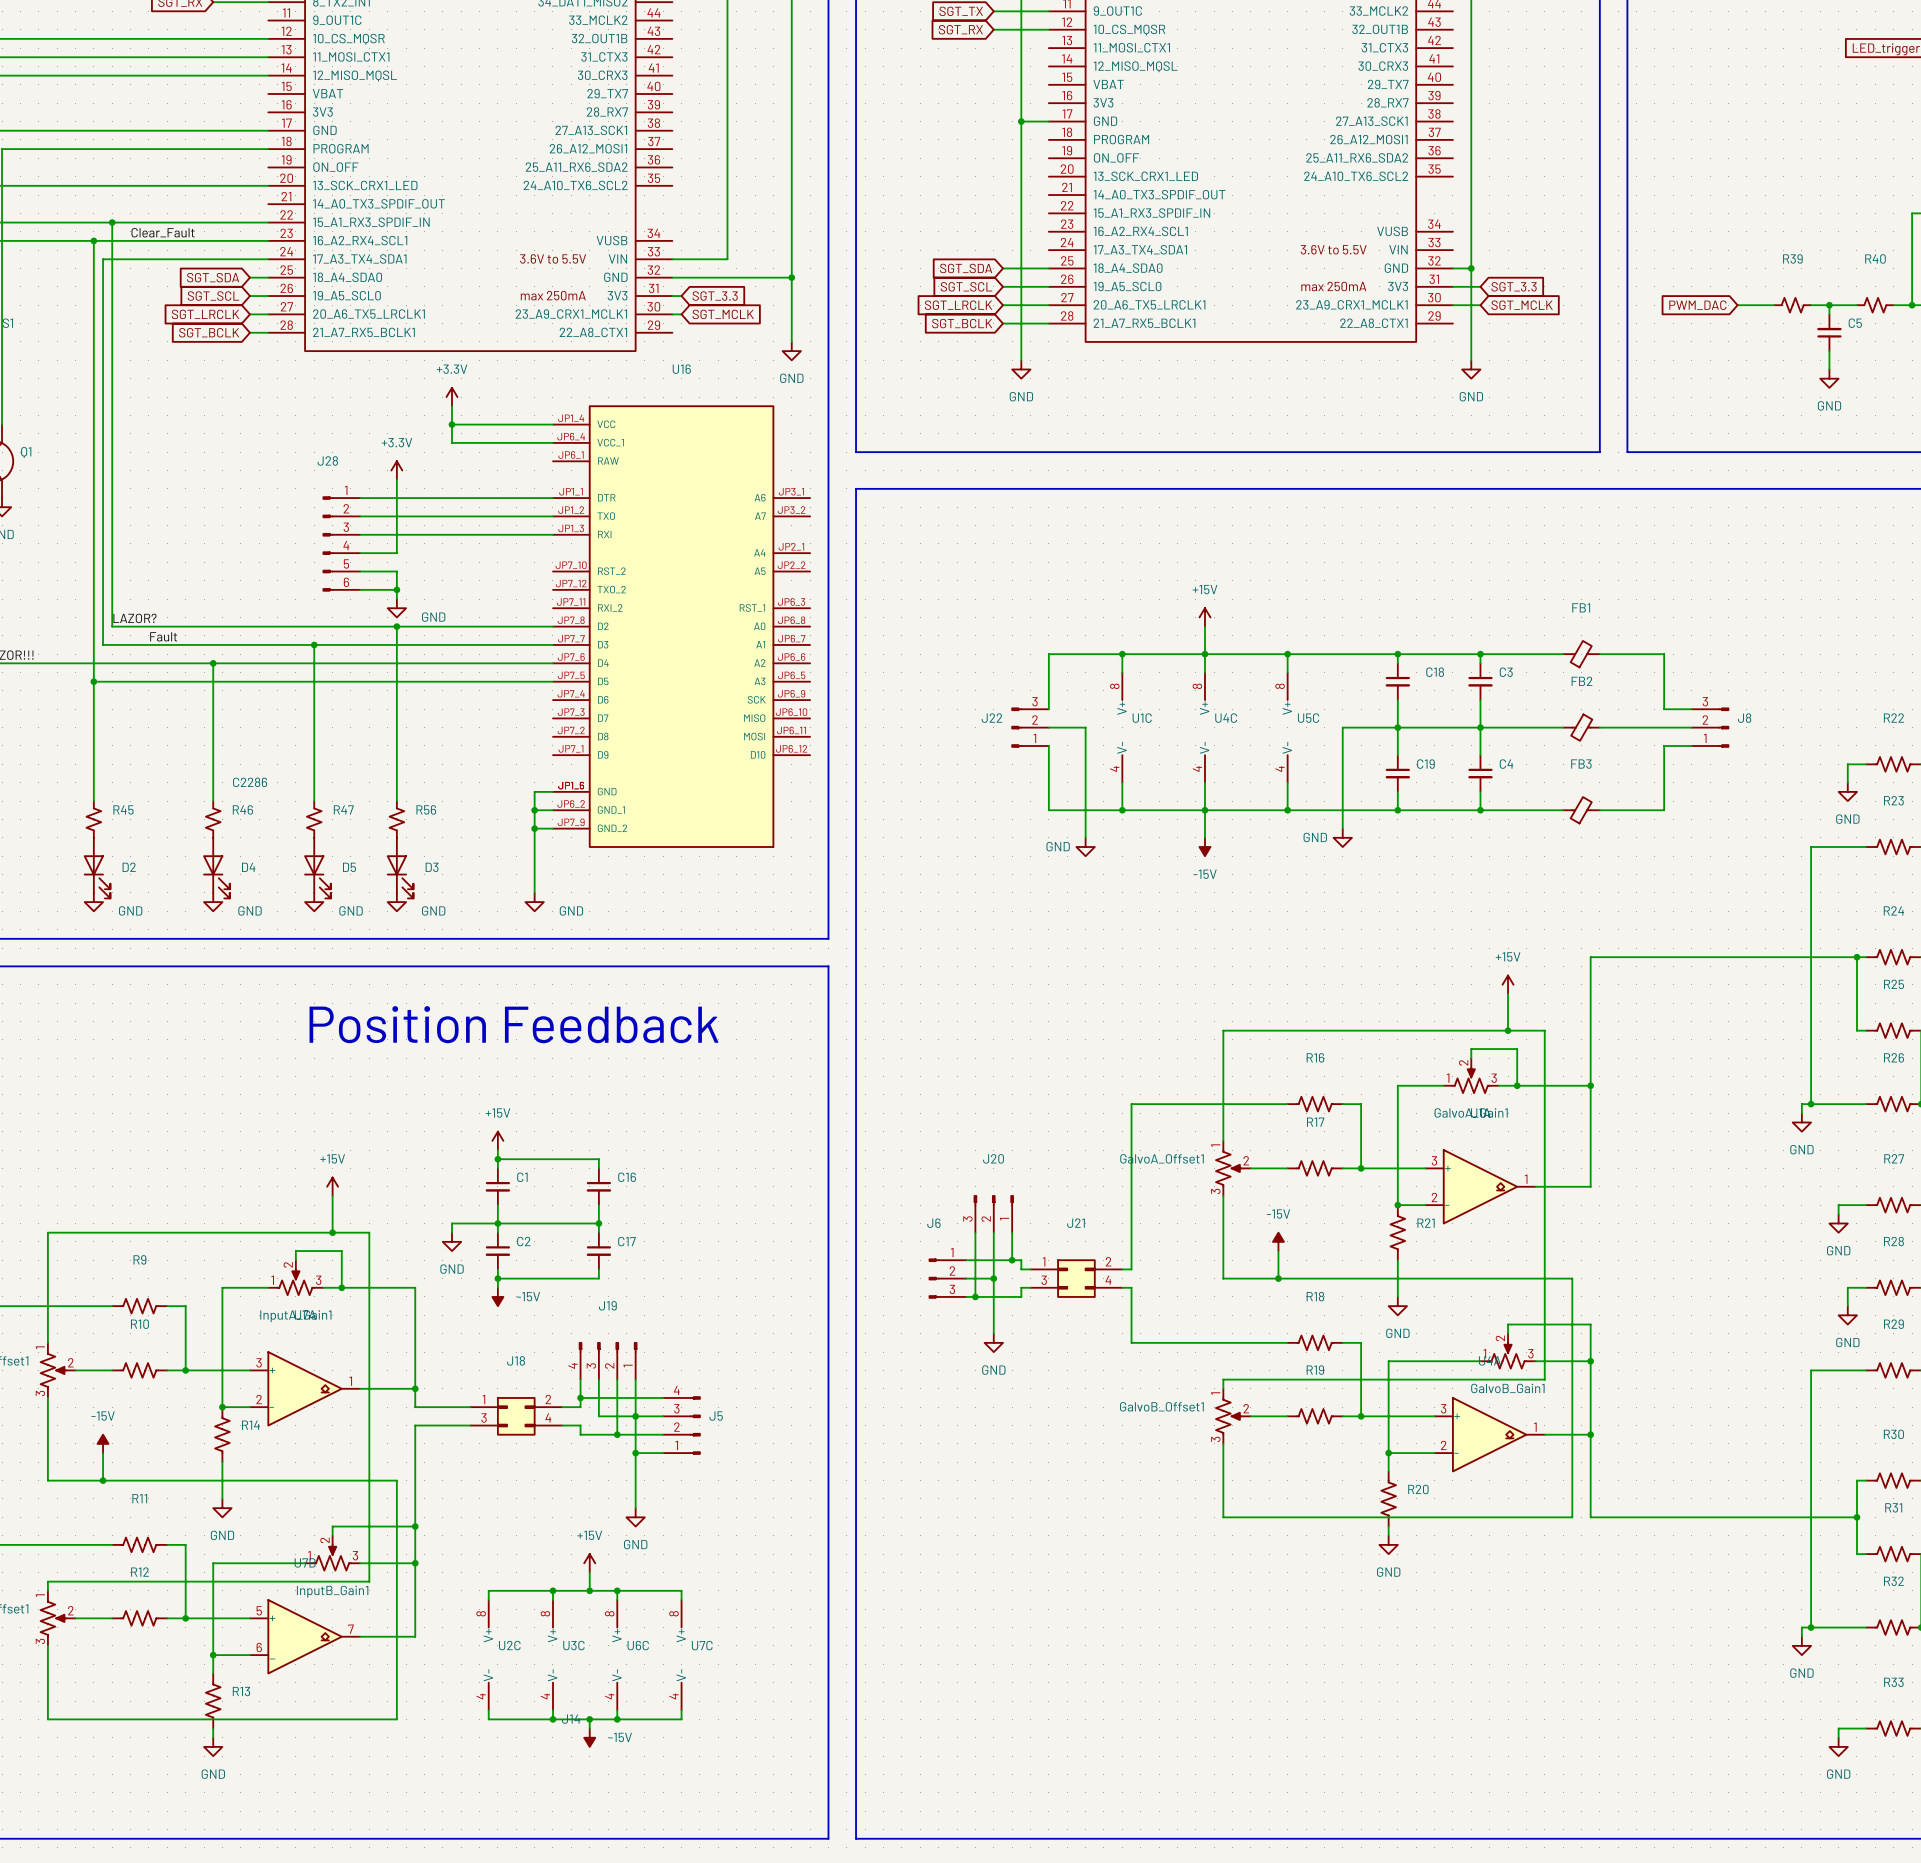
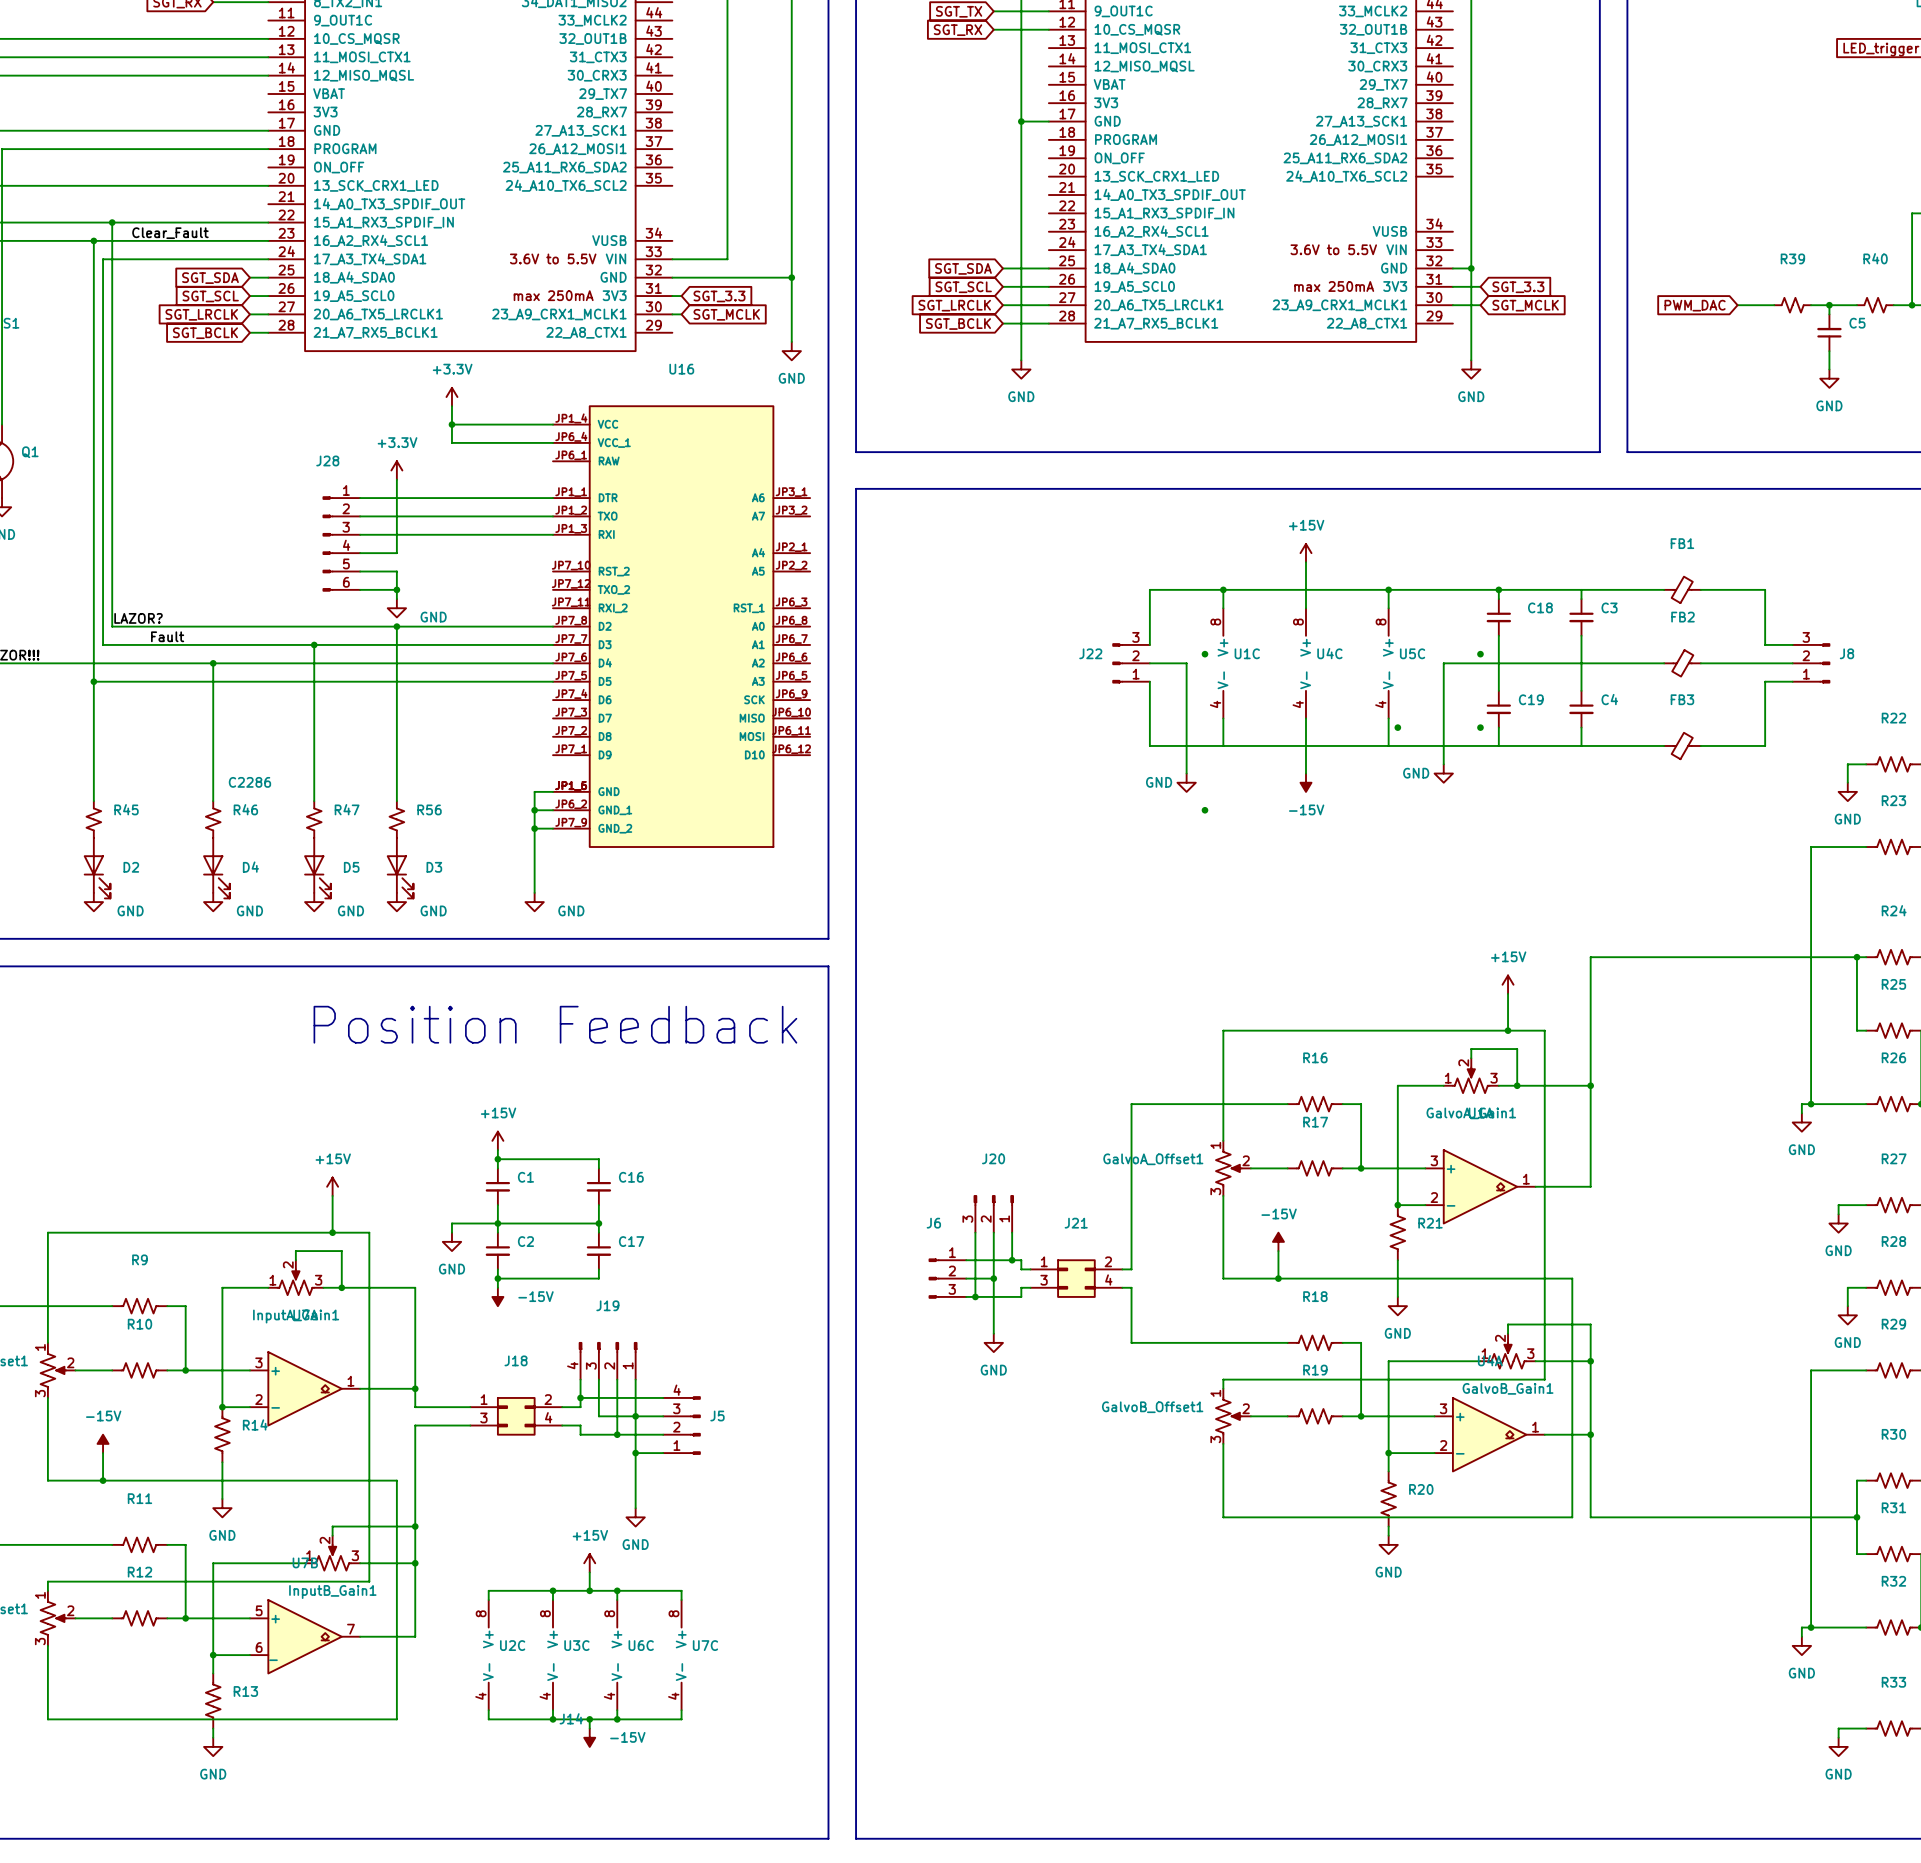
junction: none -> (1223, 589)
junction: none -> (1388, 589)
junction: none -> (1498, 589)
power symbol position: +15V (1204, 617) -> +15V (1306, 553)
wire: (1204, 626) (1204, 672) -> (1306, 562) (1306, 608)
wire: (1122, 654) (1122, 672) -> (1223, 589) (1223, 608)
junction: (1122, 654) -> none
wire: (1287, 654) (1287, 672) -> (1388, 589) (1388, 608)
junction: (1287, 654) -> none
wire: (1397, 654) (1397, 663) -> (1498, 589) (1498, 599)
junction: (1397, 654) -> none
wire: (1480, 654) (1480, 663) -> (1581, 589) (1581, 599)
wire: (1563, 654) (1048, 654) (1048, 709) -> (1664, 589) (1149, 589) (1149, 644)
FB1 position: (1581, 654) -> (1682, 589)
wire: (1599, 654) (1664, 654) (1664, 709) (1691, 709) -> (1700, 589) (1765, 589) (1765, 644) (1792, 644)
C18 position: (1397, 681) -> (1498, 617)
C3 position: (1480, 681) -> (1581, 617)
wire: (1397, 700) (1397, 755) -> (1498, 635) (1498, 690)
wire: (1480, 700) (1480, 755) -> (1581, 635) (1581, 690)
J22 position: (1030, 727) -> (1131, 663)
wire: (1048, 727) (1085, 727) (1085, 837) -> (1149, 663) (1186, 663) (1186, 773)
U1C position: (1122, 727) -> (1223, 663)
U4C position: (1204, 727) -> (1306, 663)
U5C position: (1287, 727) -> (1388, 663)
wire: (1563, 727) (1342, 727) (1342, 828) -> (1664, 663) (1443, 663) (1443, 764)
FB2 position: (1581, 727) -> (1682, 663)
wire: (1599, 727) (1691, 727) -> (1700, 663) (1792, 663)
J8 position: (1710, 727) -> (1811, 663)
wire: (1048, 745) (1048, 810) (1563, 810) -> (1149, 681) (1149, 745) (1664, 745)
wire: (1691, 745) (1664, 745) (1664, 810) (1599, 810) -> (1792, 681) (1765, 681) (1765, 745) (1700, 745)
C19 position: (1397, 773) -> (1498, 709)
power symbol: none -> GND (1443, 773)
C4 position: (1480, 773) -> (1581, 709)
wire: (1122, 782) (1122, 810) -> (1223, 718) (1223, 745)
power symbol: none -> GND (1186, 782)
wire: (1204, 782) (1204, 837) -> (1306, 718) (1306, 773)
wire: (1287, 782) (1287, 810) -> (1388, 718) (1388, 745)
wire: (1397, 791) (1397, 810) -> (1498, 727) (1498, 745)
wire: (1480, 791) (1480, 810) -> (1581, 727) (1581, 745)
junction: (1122, 810) -> none
junction: (1287, 810) -> none
junction: (1397, 810) -> none
junction: (1480, 810) -> none
FB3 position: (1581, 810) -> (1682, 745)
power symbol: GND (1342, 837) -> none
power symbol: GND (1085, 847) -> none
power symbol position: -15V (1204, 847) -> -15V (1306, 782)

